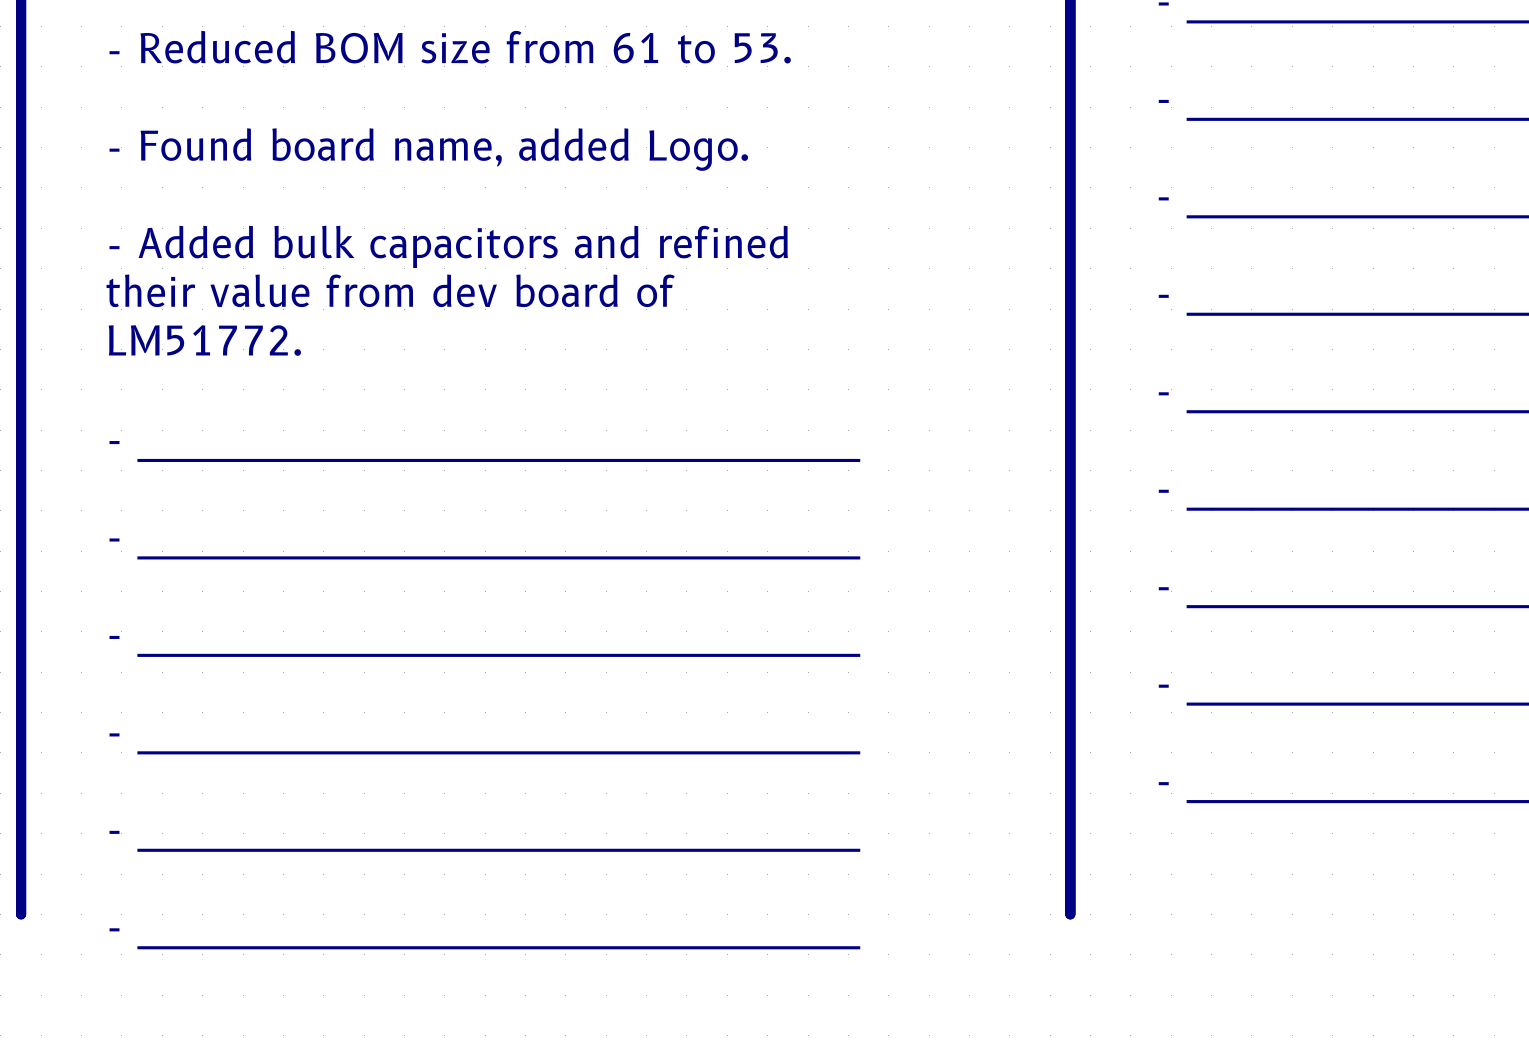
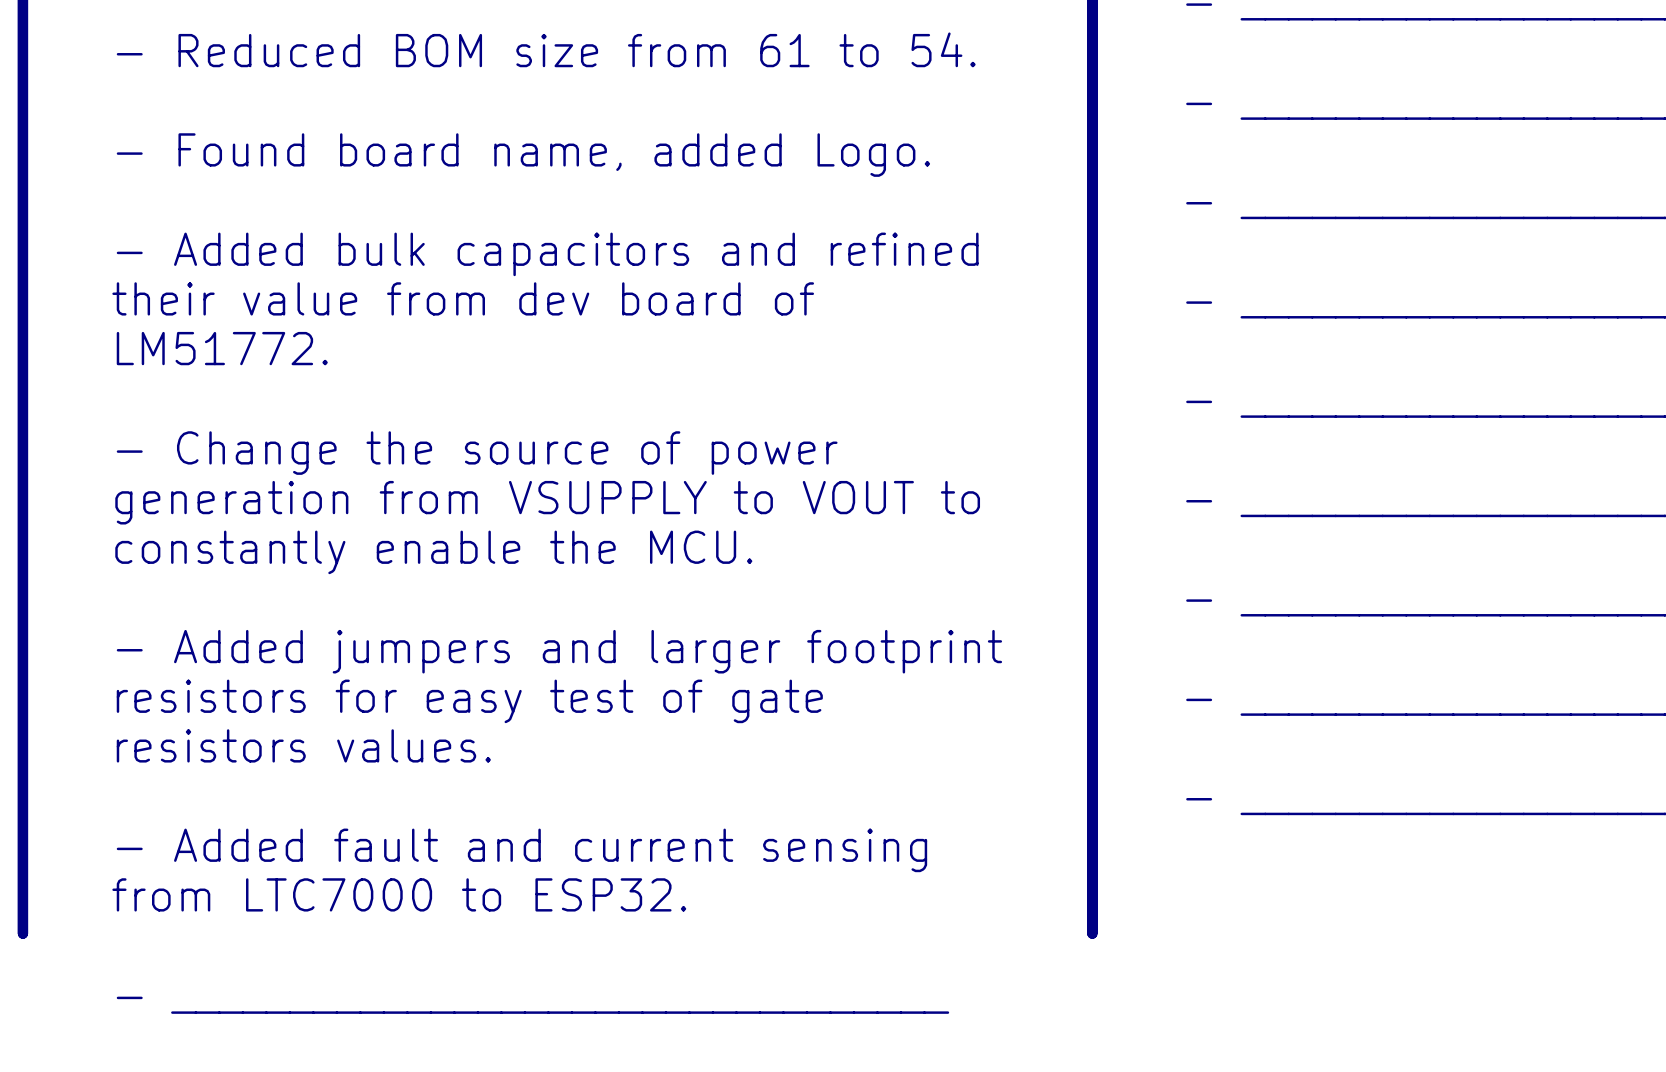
text: - Reduced BOM size from 61 to 53. (450, 47) -> - Reduced BOM size from 61 to 54. (546, 49)
text: - _________________________________ (484, 451) -> - Change the source of power (477, 453)
text: none -> generation from VSUPPLY to VOUT to (547, 502)
text: - _________________________________ (484, 548) -> constantly enable the MCU. (433, 552)
text: - _________________________________ (484, 646) -> - Added jumpers and larger footprint (559, 651)
text: none -> resistors for easy test of gate (469, 701)
text: - _________________________________ (484, 743) -> resistors values. (303, 745)
text: - _________________________________ (484, 841) -> - Added fault and current sensing (521, 850)
text: none -> from LTC7000 to ESP32. (399, 894)
text position: - _________________________________ (484, 938) -> - _________________________________ (532, 1005)

